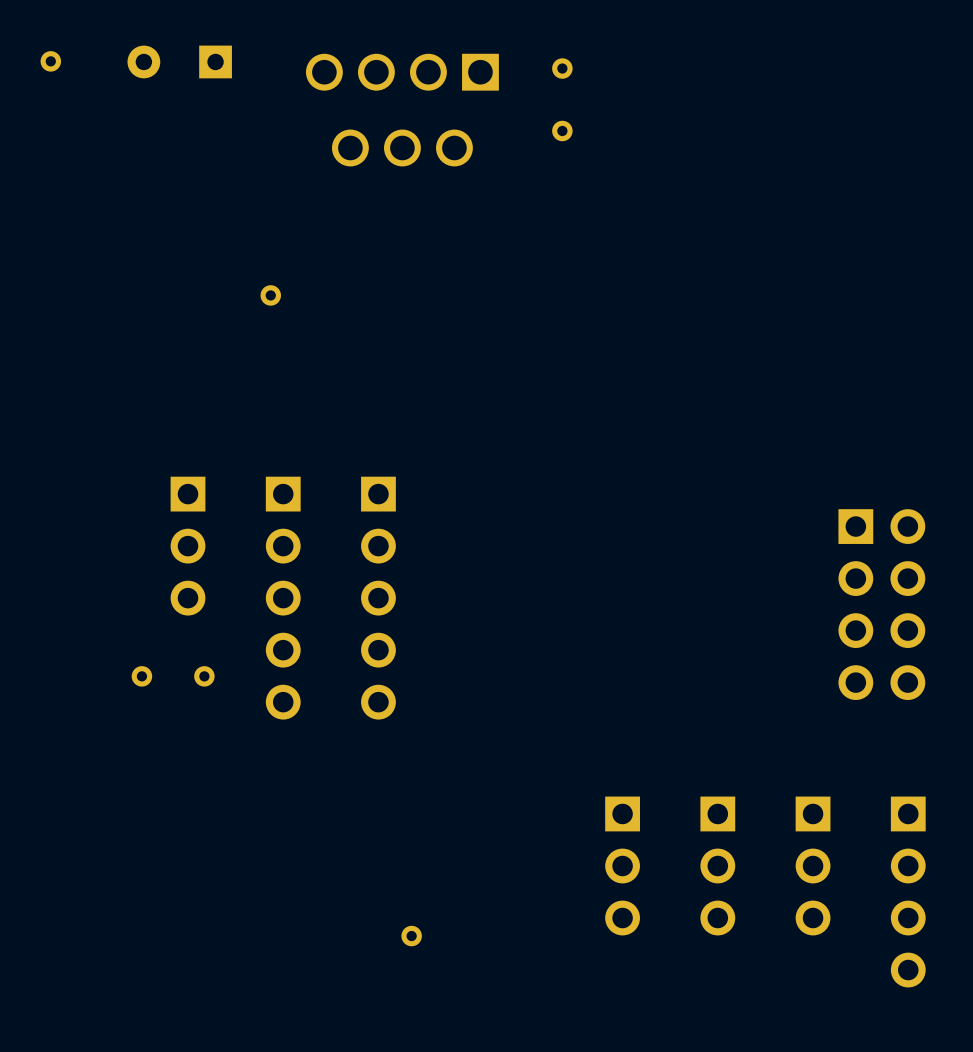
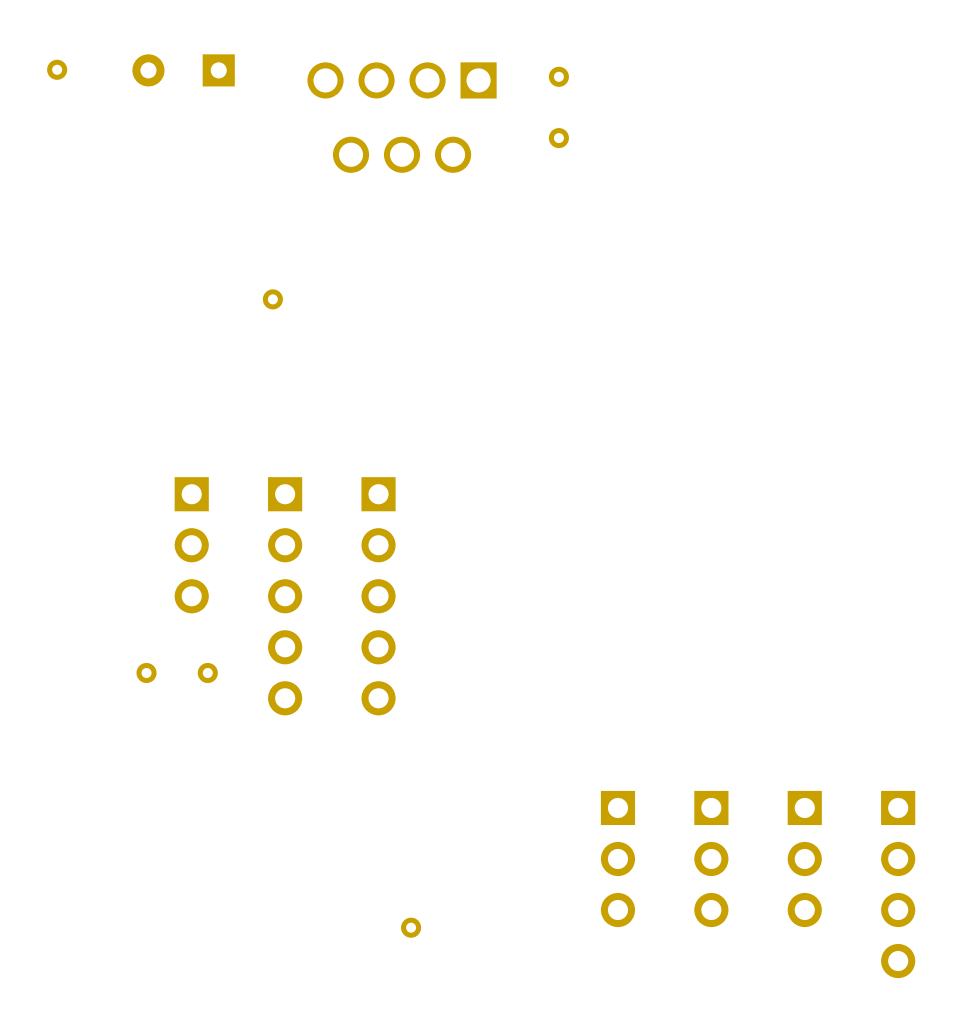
part: (881, 604) -> none

